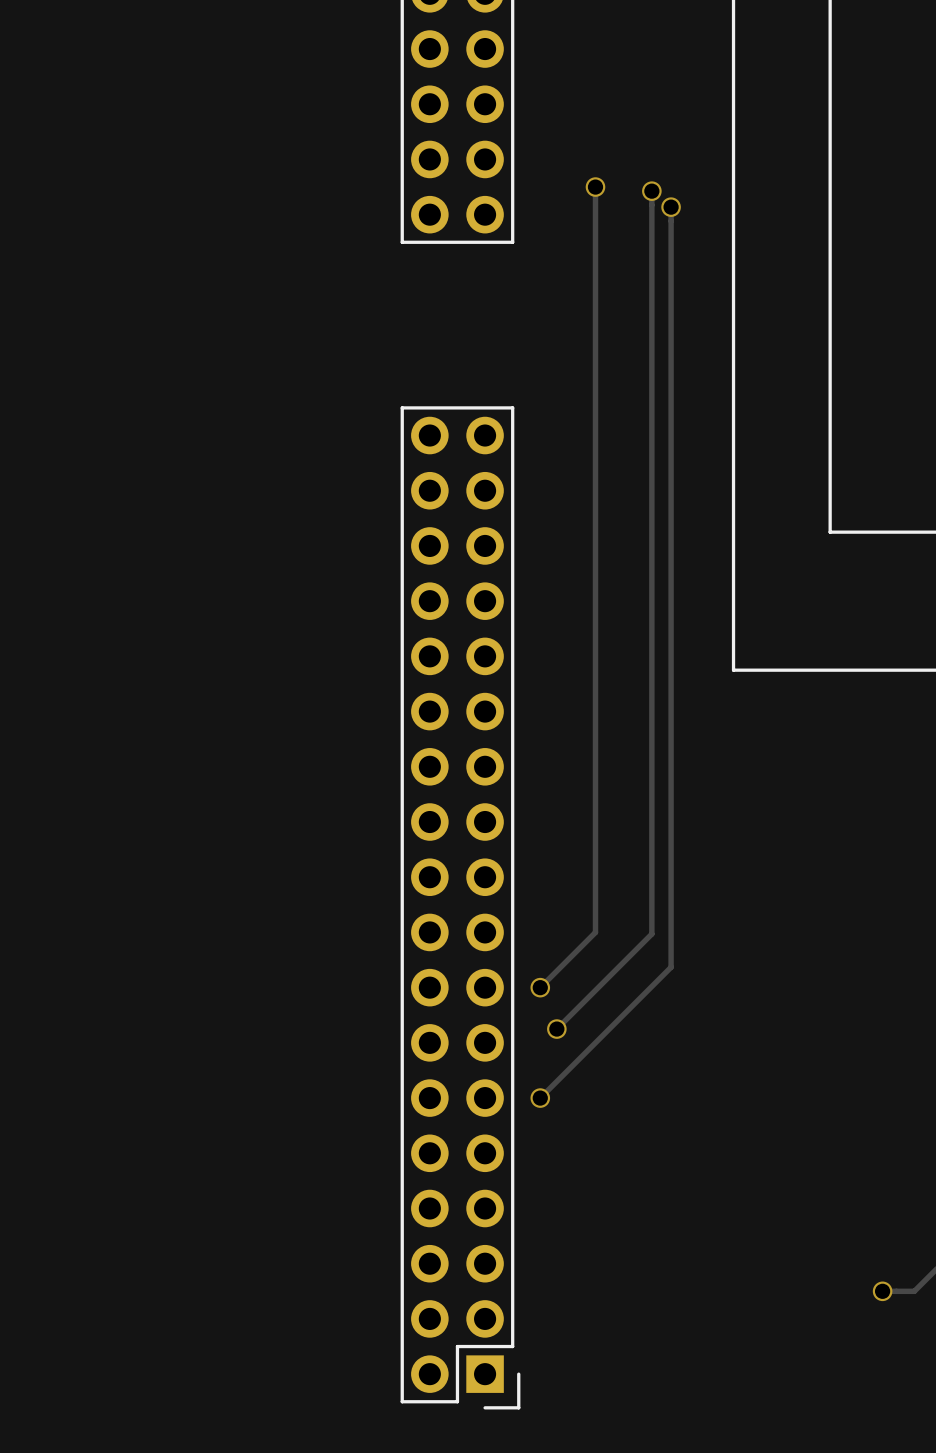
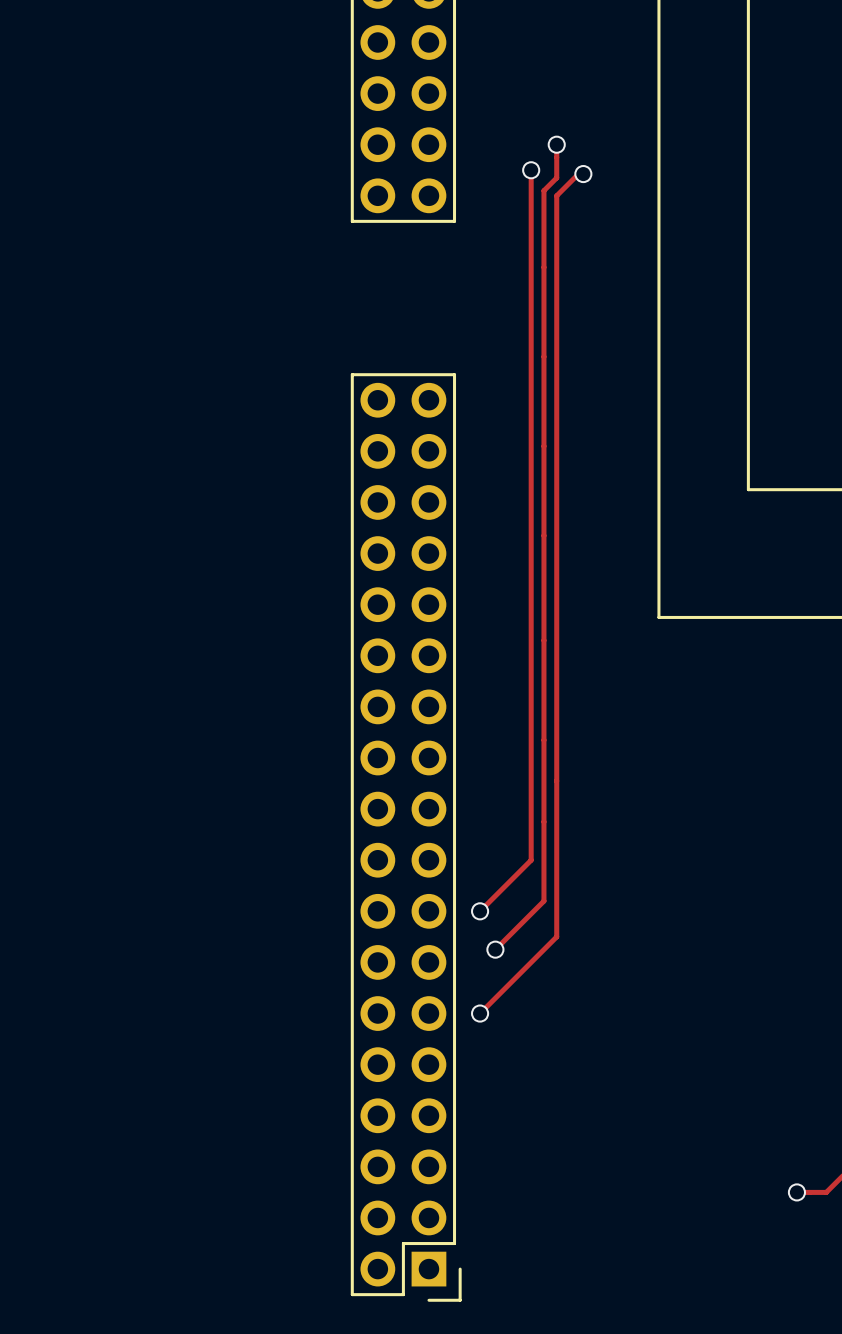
track: (651, 191) (651, 934) (609, 976) -> (556, 144) (556, 177) (543, 190) (543, 901)
track: (671, 207) (671, 967) (623, 1015) -> (582, 170) (556, 195) (556, 936)
via position: (671, 207) -> (556, 144)

